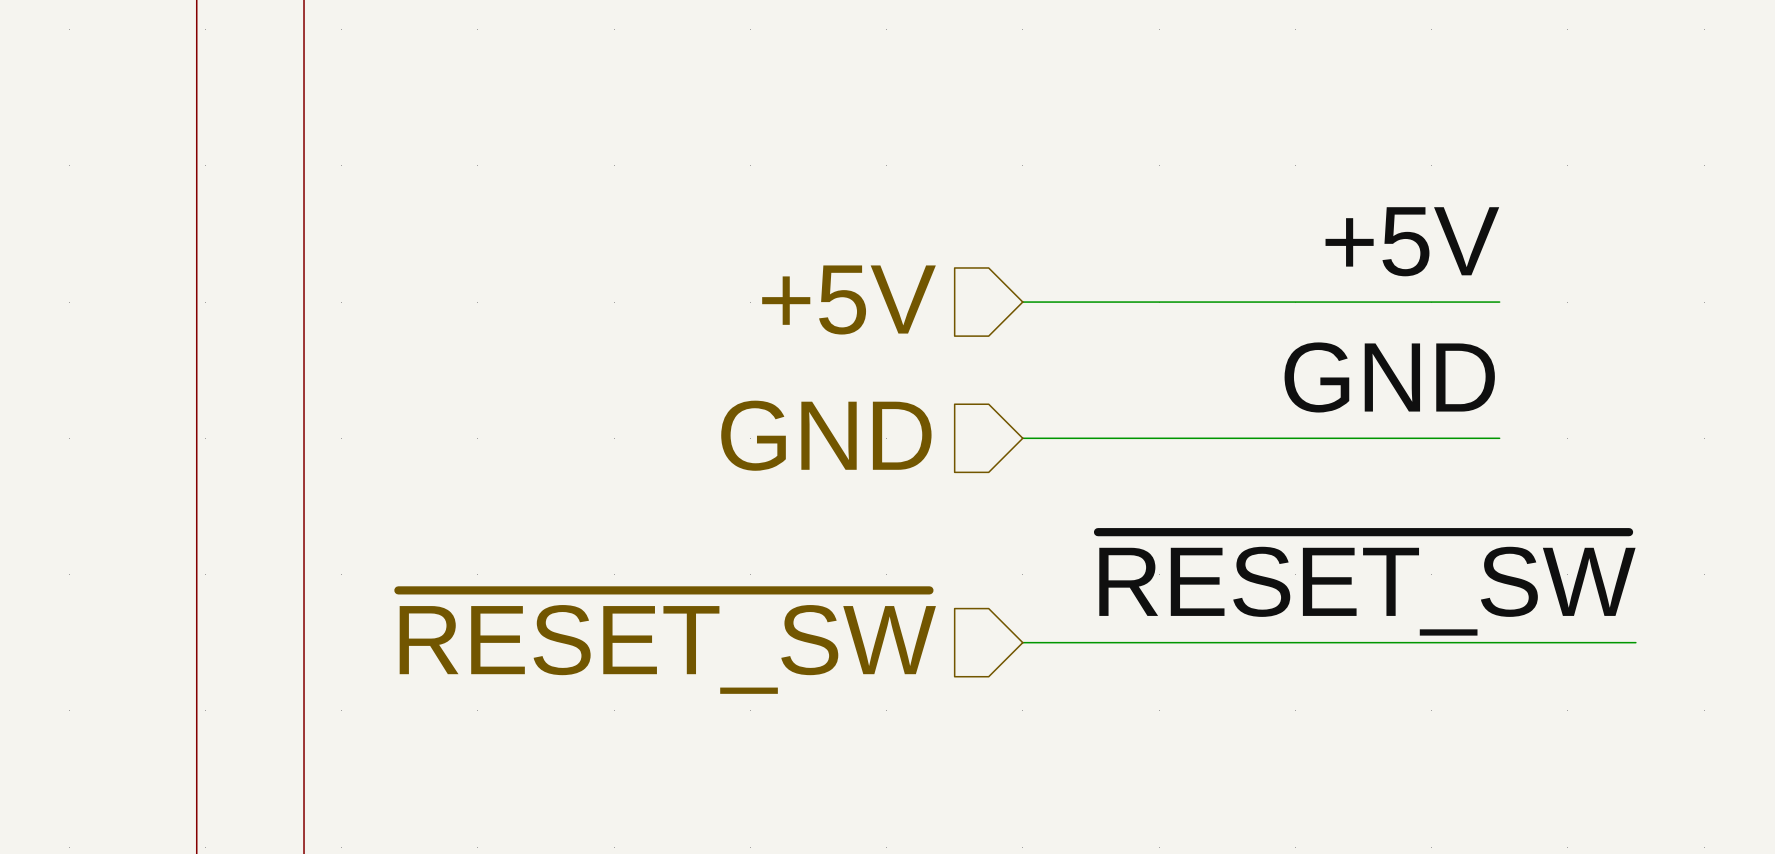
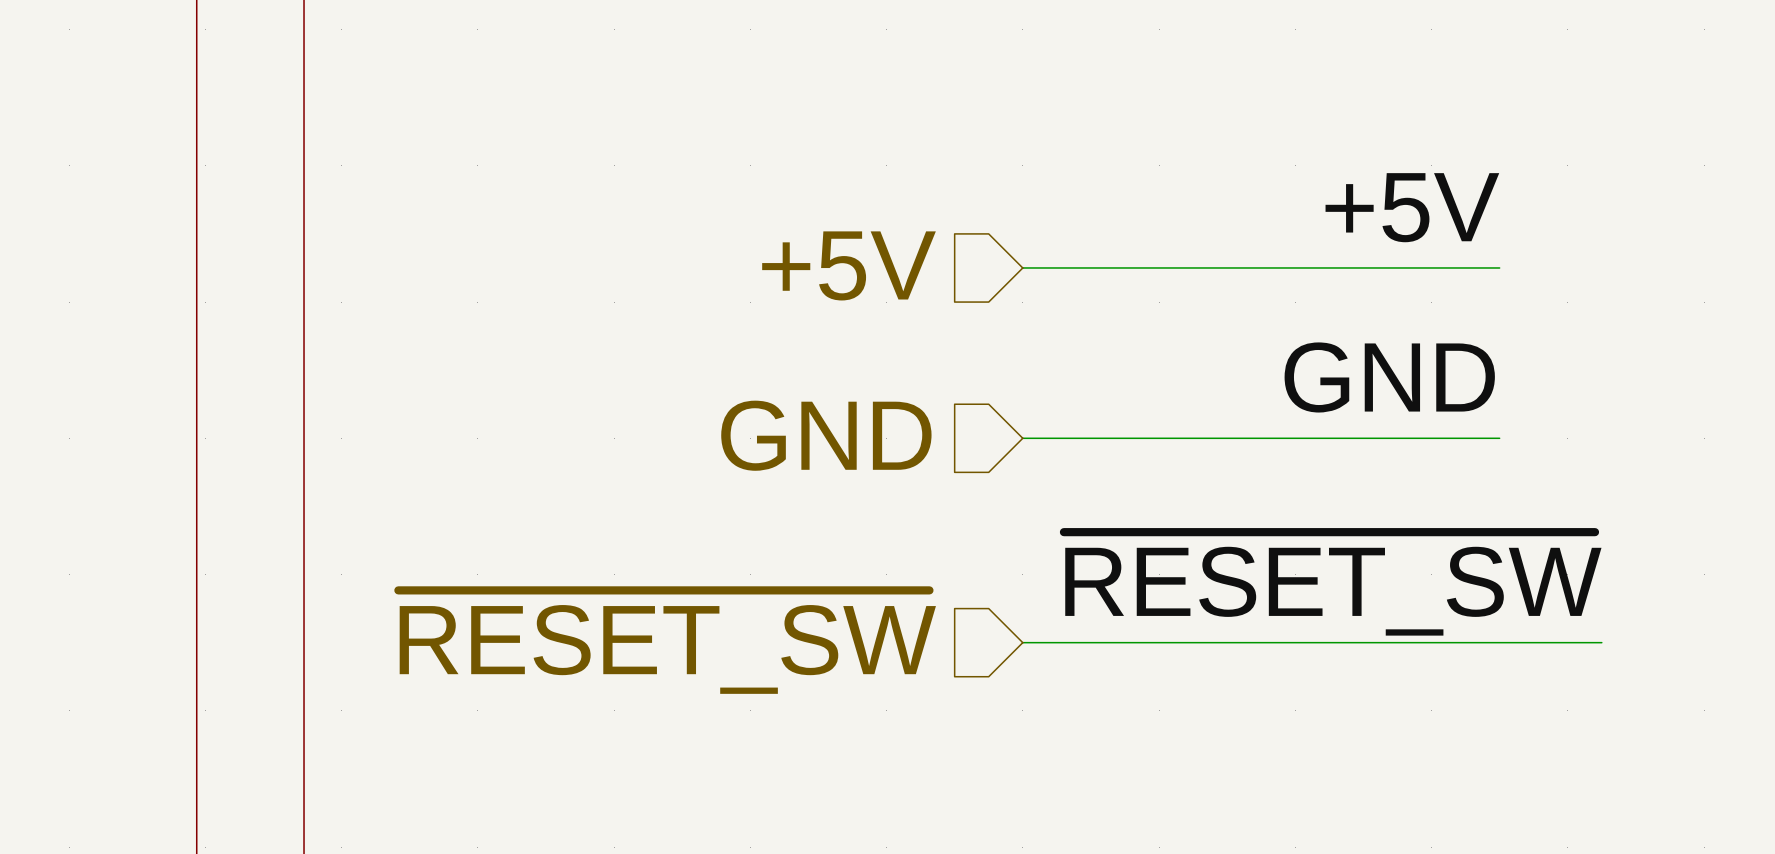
label position: +5V (1412, 241) -> +5V (1412, 207)
hierarchical label position: +5V (849, 299) -> +5V (849, 265)
wire: (1022, 302) (1499, 302) -> (1022, 267) (1499, 267)
label position: ~{RESET_SW} (1366, 583) -> ~{RESET_SW} (1332, 583)
wire: (1601, 642) (1635, 642) -> none

